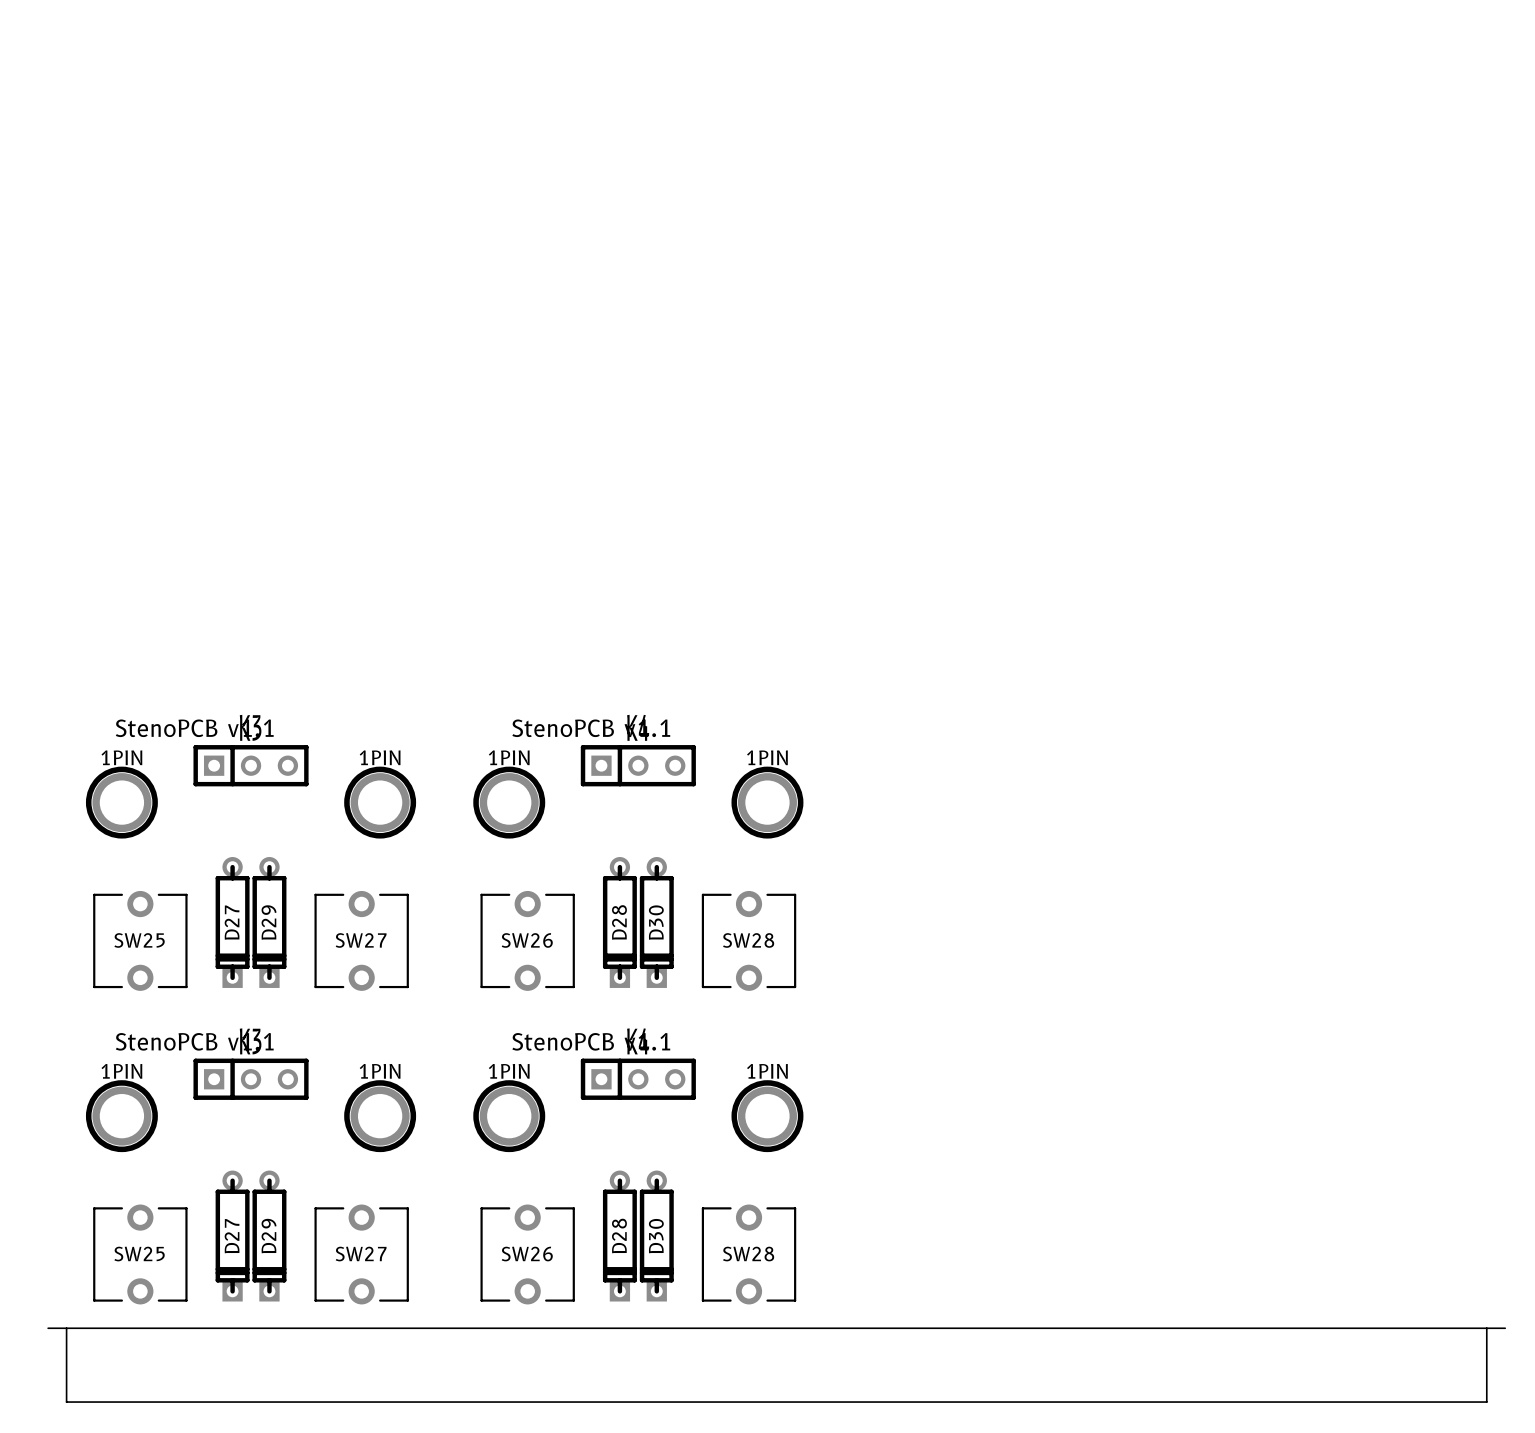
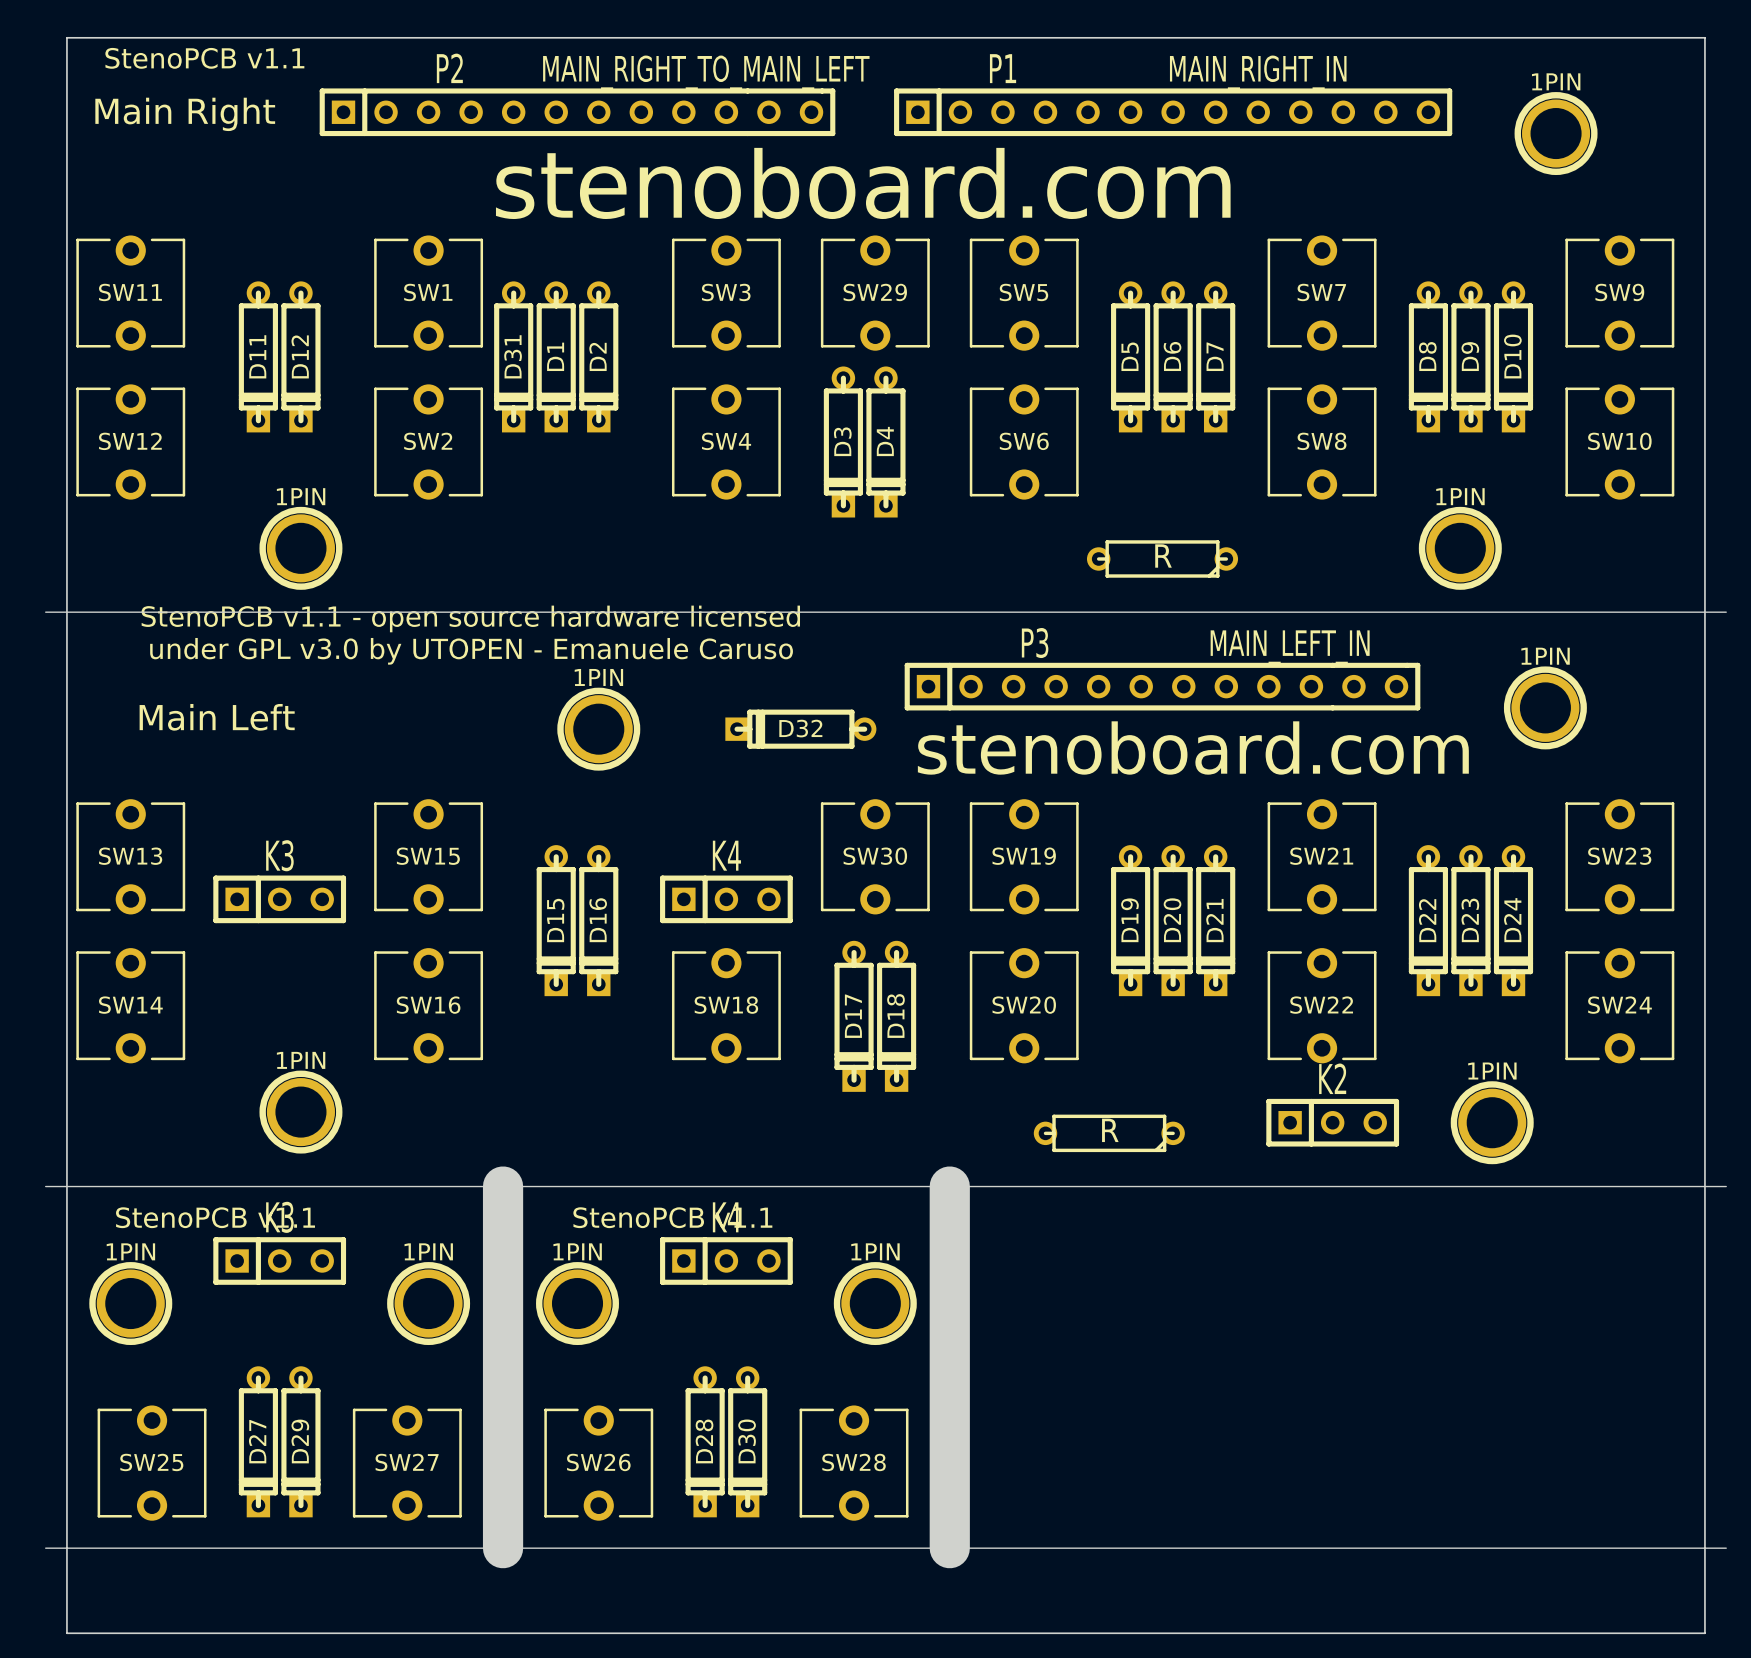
text: none -> StenoPCB v1.1 (204, 58)
P2: none -> MAIN_RIGHT_TO_MAIN_LEFT (577, 112)
P1: none -> MAIN_RIGHT_IN (1173, 112)
text: none -> Main Right (185, 114)
1PIN: none -> (1556, 133)
text: none -> stenoboard.com (863, 183)
SW11: none -> (130, 293)
SW1: none -> (428, 293)
SW3: none -> (726, 293)
SW29: none -> (875, 293)
SW5: none -> (1024, 293)
SW7: none -> (1322, 293)
SW9: none -> (1619, 293)
D11: none -> (258, 356)
D12: none -> (300, 356)
D31: none -> (513, 356)
D1: none -> (556, 356)
D2: none -> (598, 356)
D5: none -> (1130, 356)
D6: none -> (1173, 356)
D7: none -> (1215, 356)
D8: none -> (1428, 356)
D9: none -> (1470, 356)
D10: none -> (1513, 356)
SW12: none -> (130, 441)
SW2: none -> (428, 441)
SW4: none -> (726, 441)
D3: none -> (843, 441)
D4: none -> (885, 441)
SW6: none -> (1024, 441)
SW8: none -> (1322, 441)
SW10: none -> (1619, 441)
1PIN: none -> (300, 548)
1PIN: none -> (1460, 548)
part: none -> R (1162, 558)
board edge: none -> (45, 612) (1726, 612)
text: none -> StenoPCB v1.1 - open source hardware licensed (470, 618)
text: none -> under GPL v3.0 by UTOPEN - Emanuele Caruso (471, 651)
P3: none -> MAIN_LEFT_IN (1162, 686)
1PIN: none -> (1545, 707)
text: none -> Main Left (217, 717)
1PIN: none -> (598, 729)
D32: none -> (800, 729)
text: none -> stenoboard.com (1193, 747)
SW13: none -> (130, 856)
text: StenoPCB v1.1 (194, 728) -> none
SW15: none -> (428, 856)
text: StenoPCB v1.1 (591, 728) -> none
SW30: none -> (875, 856)
SW19: none -> (1024, 856)
SW21: none -> (1322, 856)
SW23: none -> (1619, 856)
D15: none -> (556, 920)
D16: none -> (598, 920)
D19: none -> (1130, 920)
D20: none -> (1173, 920)
D21: none -> (1215, 920)
D22: none -> (1428, 920)
D23: none -> (1470, 920)
D24: none -> (1513, 920)
1PIN: (121, 802) -> none
1PIN: (380, 802) -> none
1PIN: (509, 802) -> none
1PIN: (767, 802) -> none
SW14: none -> (130, 1005)
SW16: none -> (428, 1005)
SW18: none -> (726, 1005)
SW20: none -> (1024, 1005)
SW22: none -> (1322, 1005)
SW24: none -> (1619, 1005)
D17: none -> (854, 1016)
D18: none -> (896, 1016)
D27: (232, 922) -> none
D29: (269, 922) -> none
D28: (619, 922) -> none
D30: (656, 922) -> none
SW25: (140, 940) -> none
SW27: (361, 940) -> none
SW26: (527, 940) -> none
SW28: (749, 940) -> none
1PIN: none -> (300, 1112)
K2: none -> (1332, 1122)
1PIN: none -> (1492, 1122)
part: none -> R (1109, 1133)
board edge: none -> (45, 1186) (1726, 1186)
board edge: none -> (503, 1186) (503, 1548)
board edge: none -> (949, 1186) (949, 1548)
board edge: none -> (66, 1548) (66, 37) (1704, 37) (1704, 1548)

